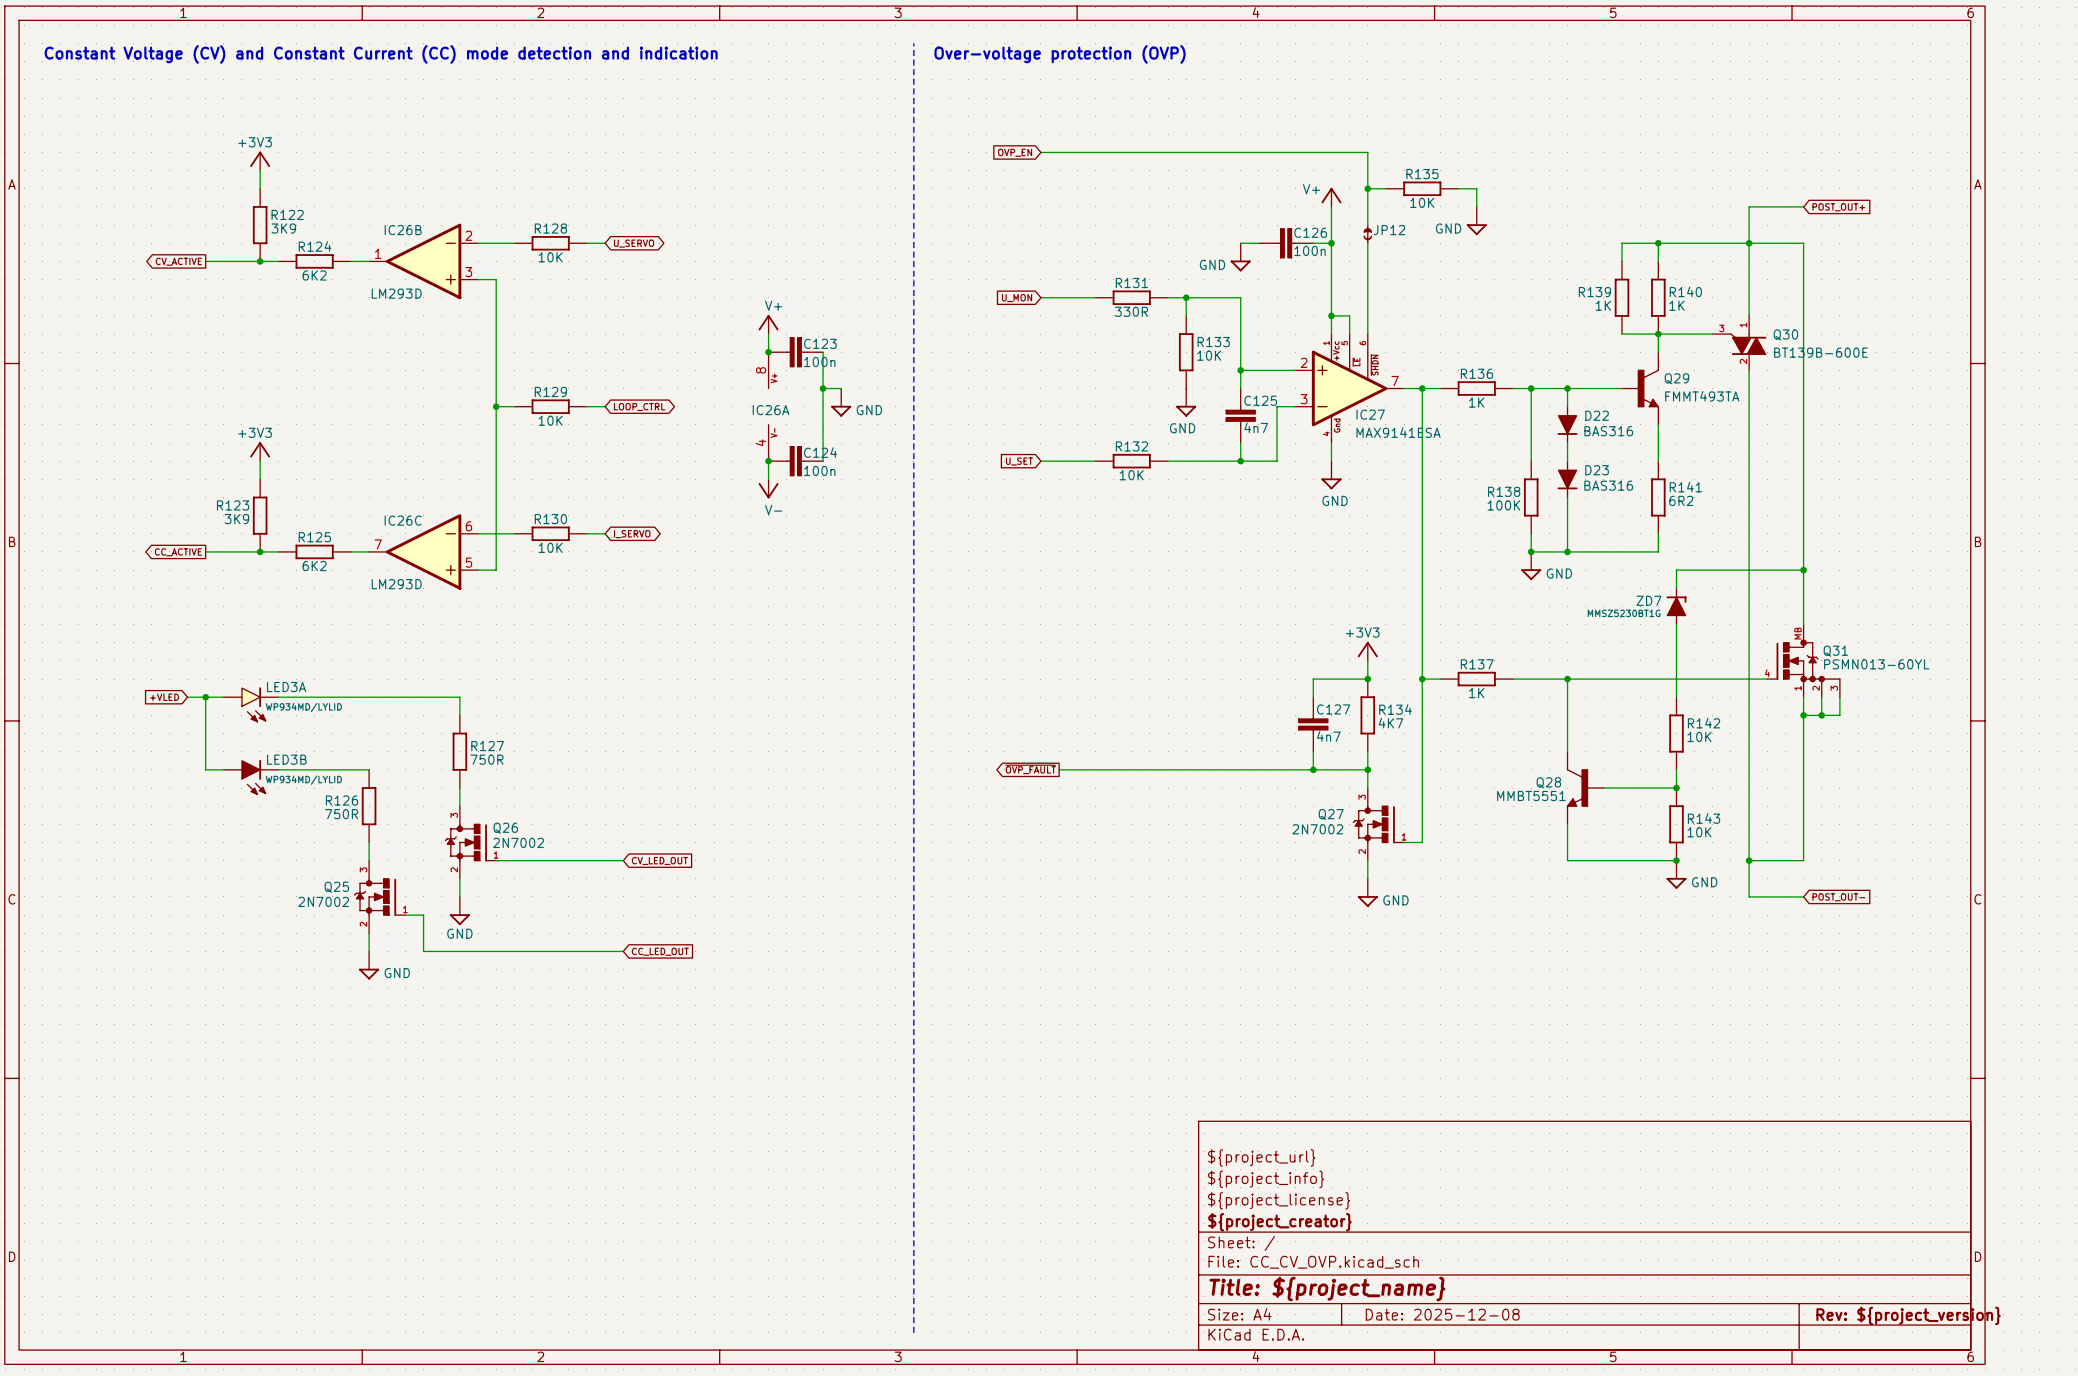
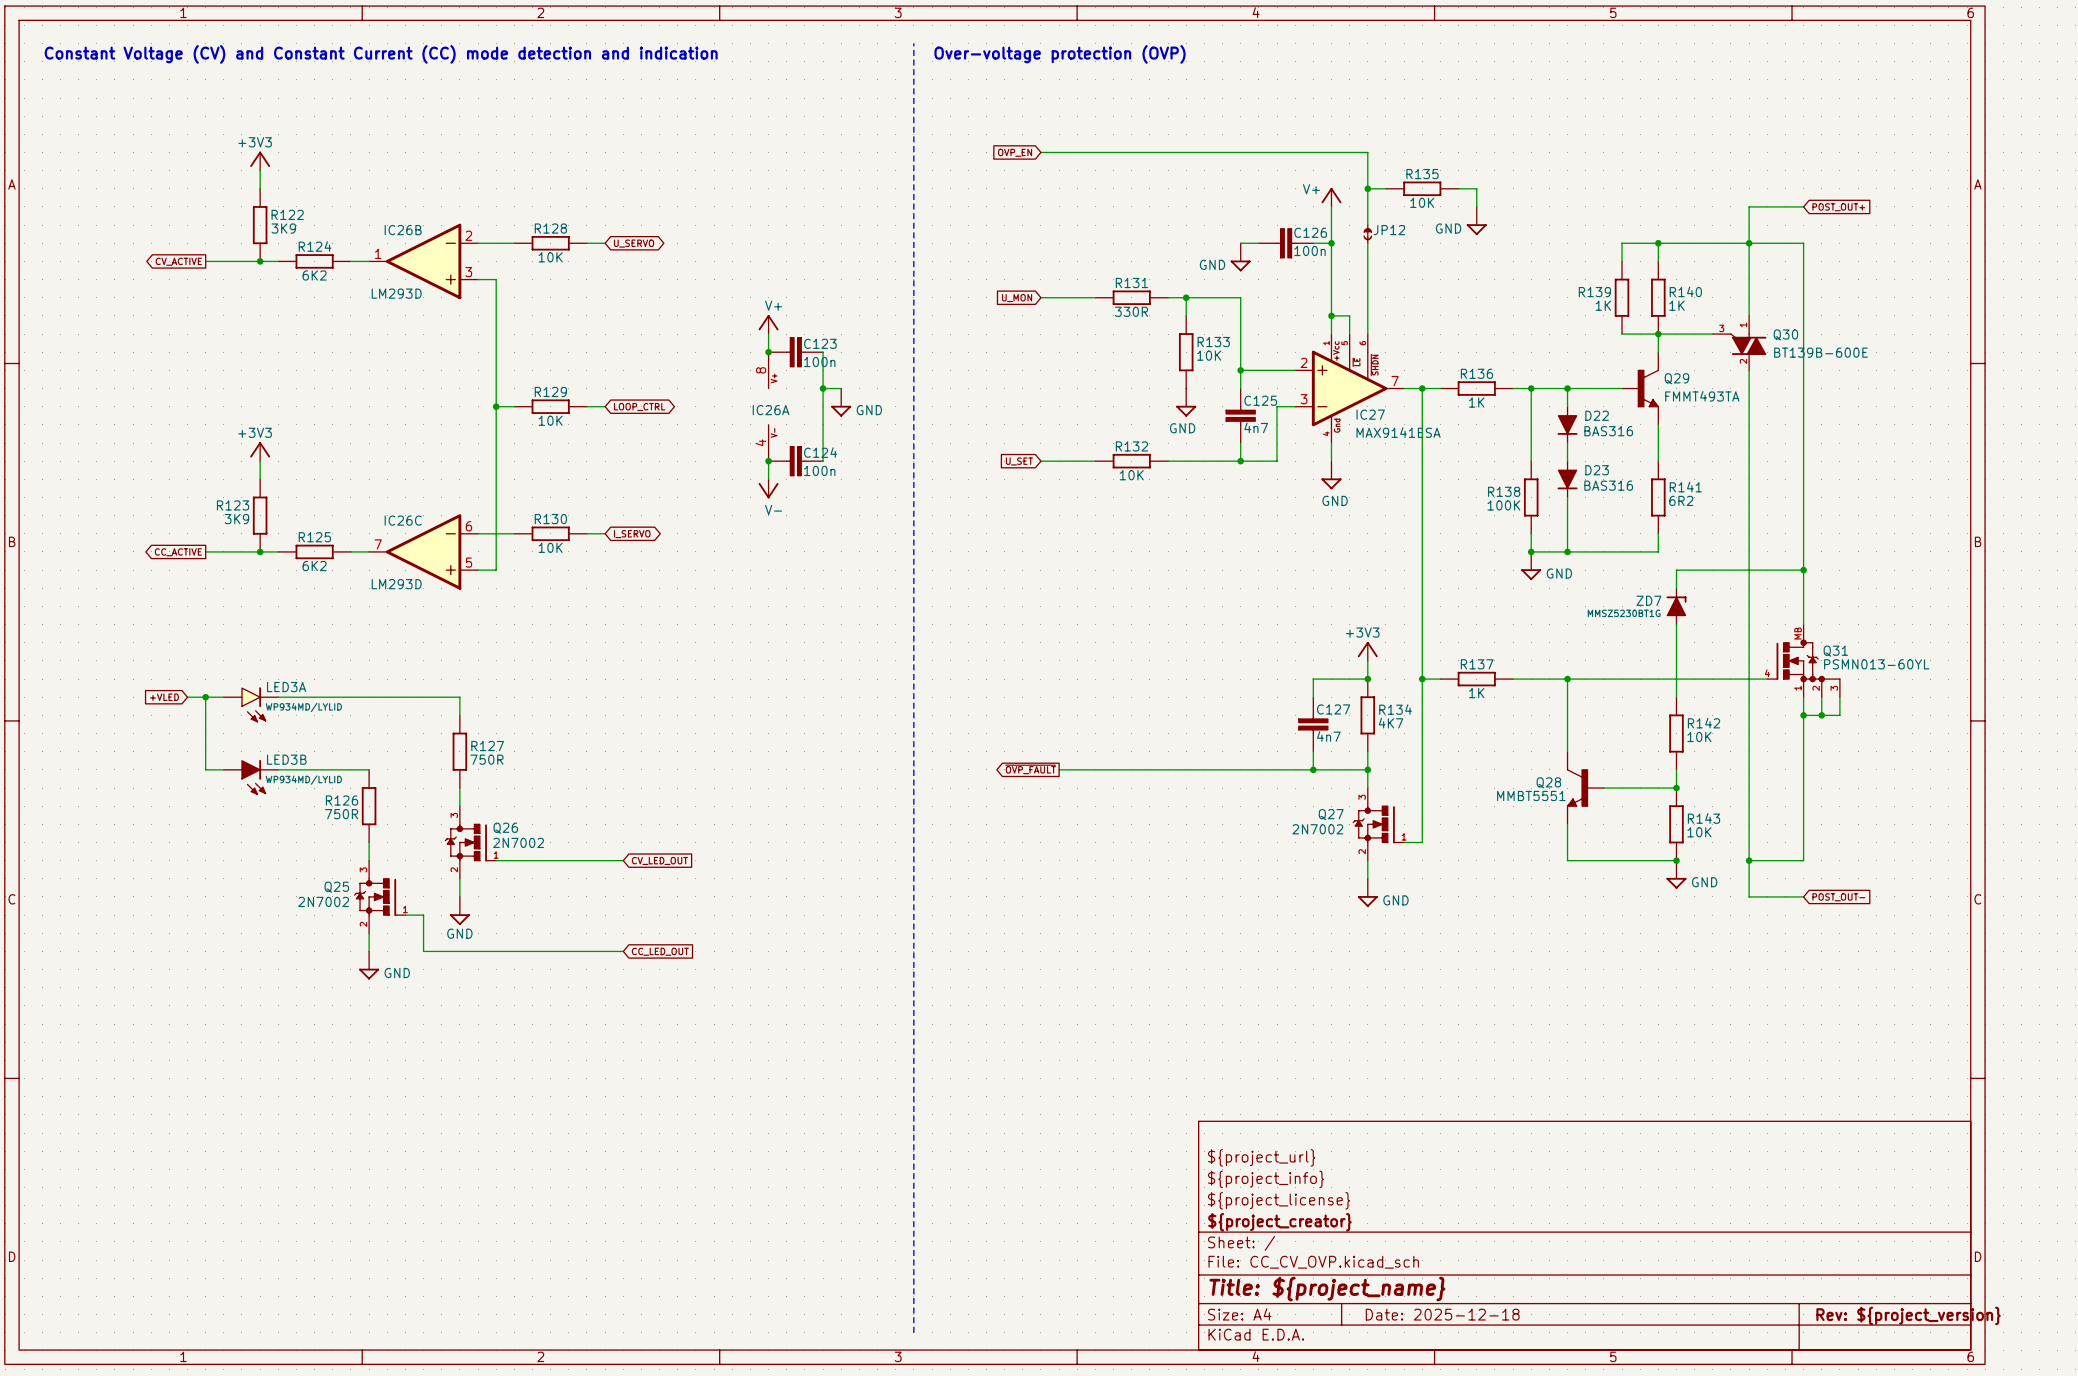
title block: Date: 2025-12-08 (1442, 1314) -> Date: 2025-12-18 (1442, 1314)

